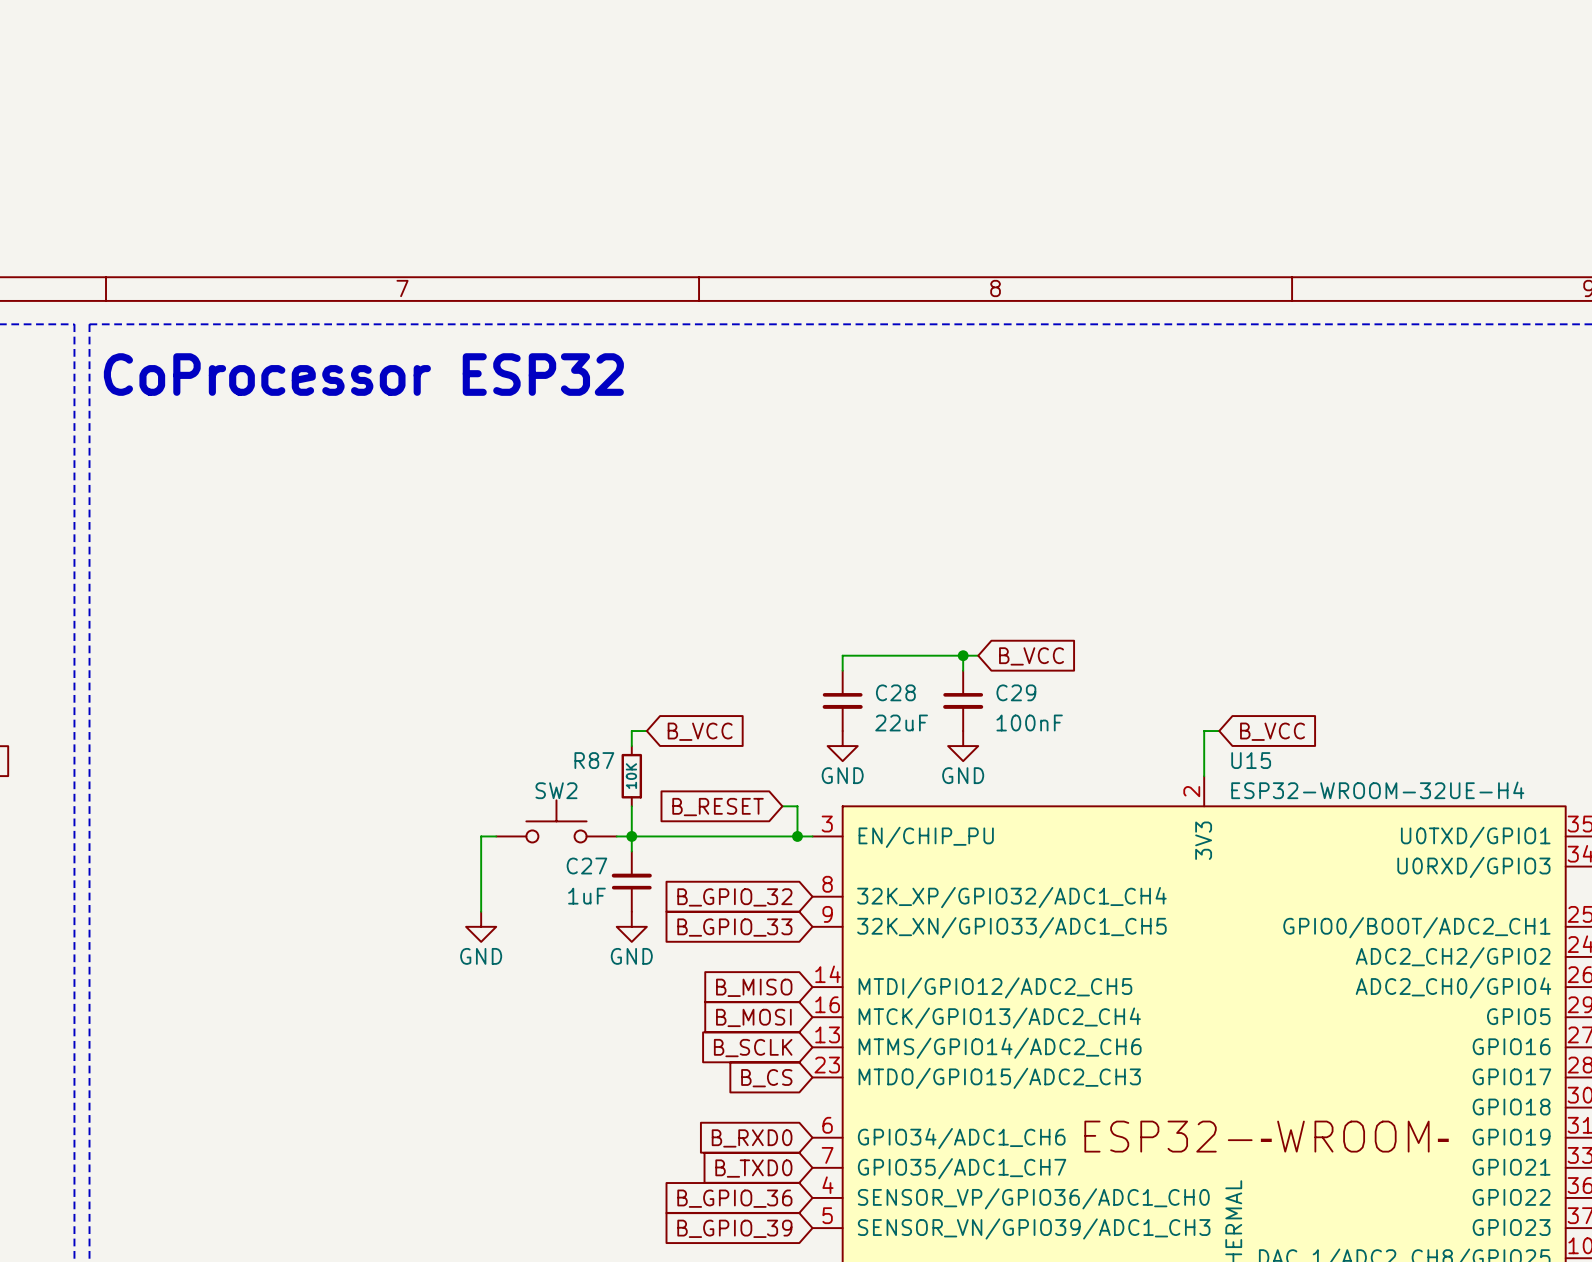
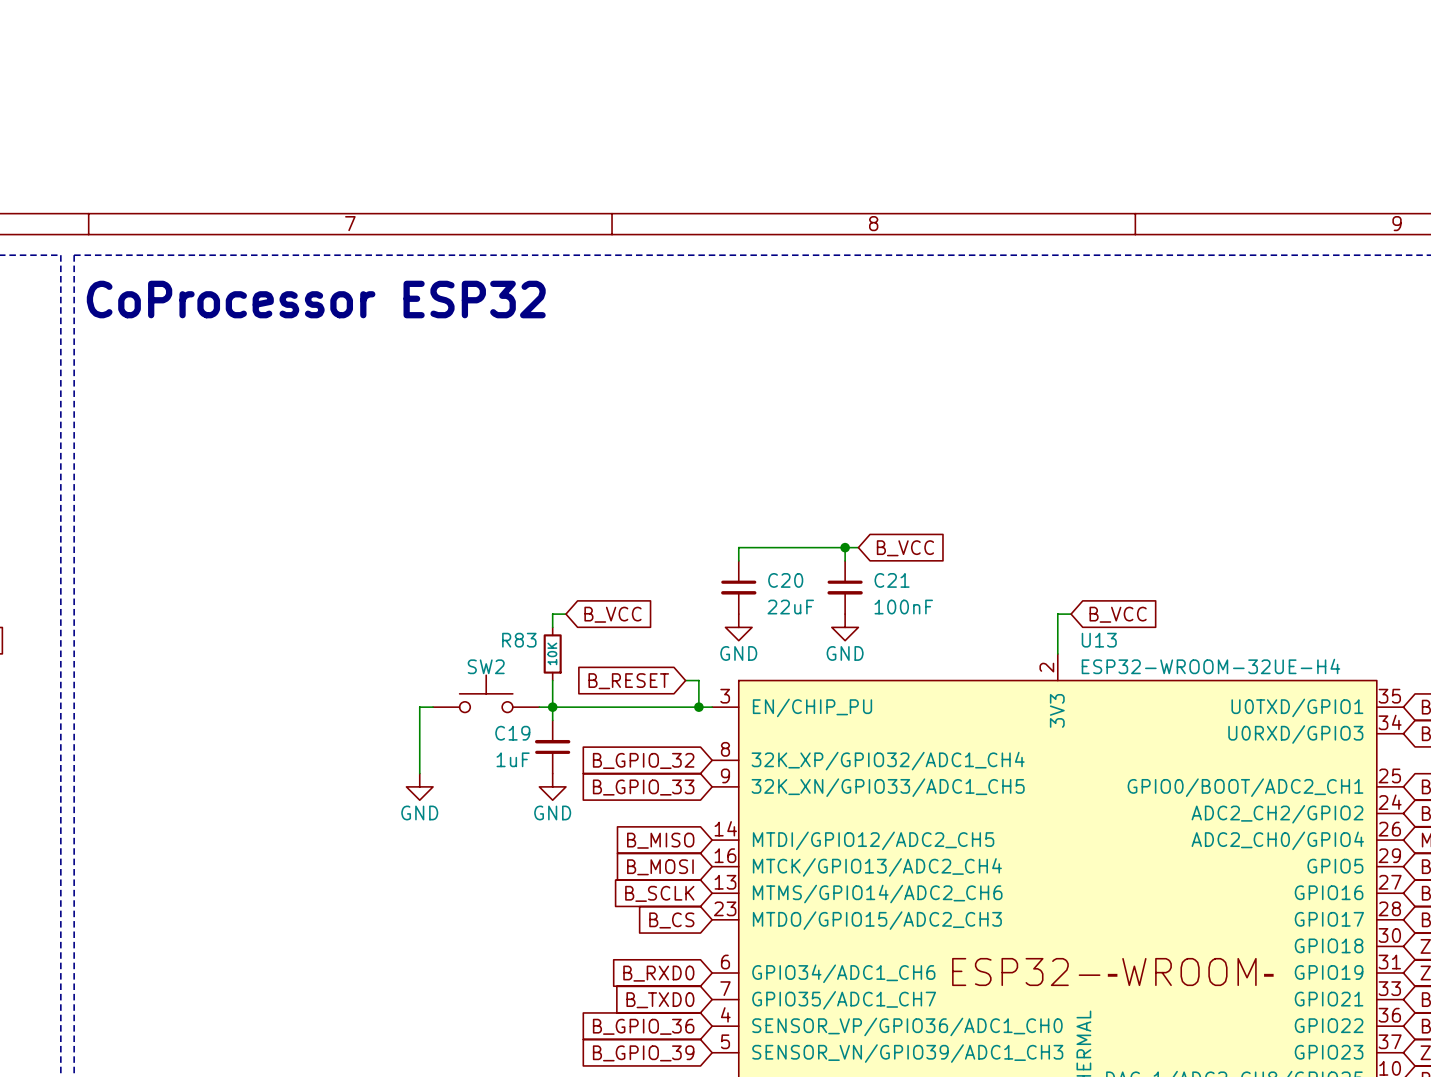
C28 name: C28 (895, 692) -> C20 (785, 580)
C29 name: C29 (1016, 692) -> C21 (892, 580)
R87 name: R87 (594, 760) -> R83 (519, 640)
U15 name: U15 (1251, 760) -> U13 (1099, 640)
C27 name: C27 (586, 866) -> C19 (512, 733)

